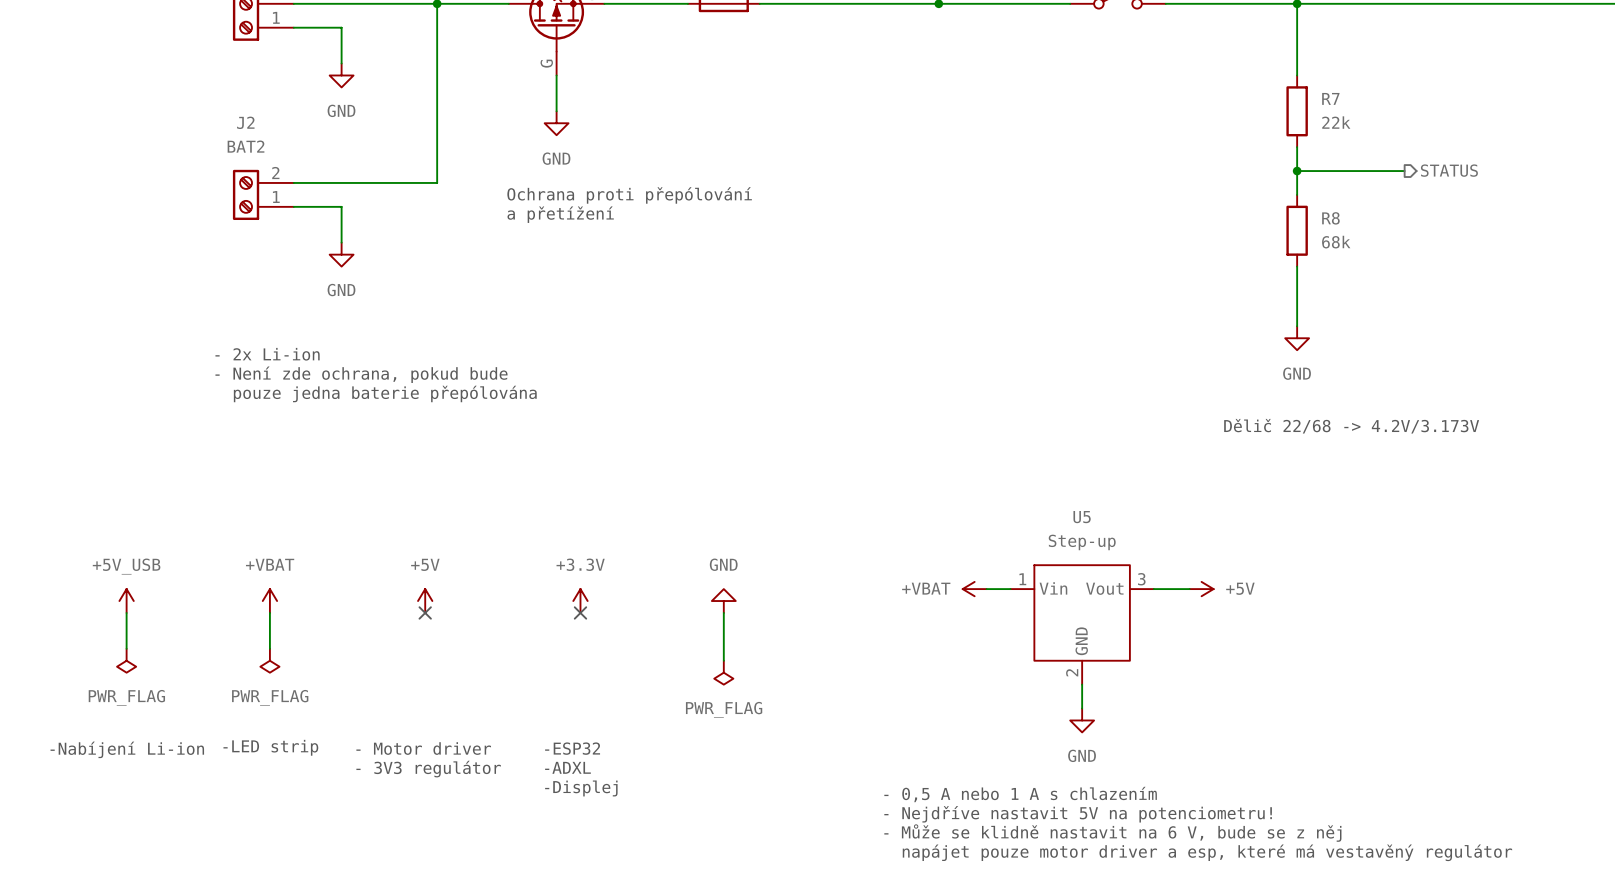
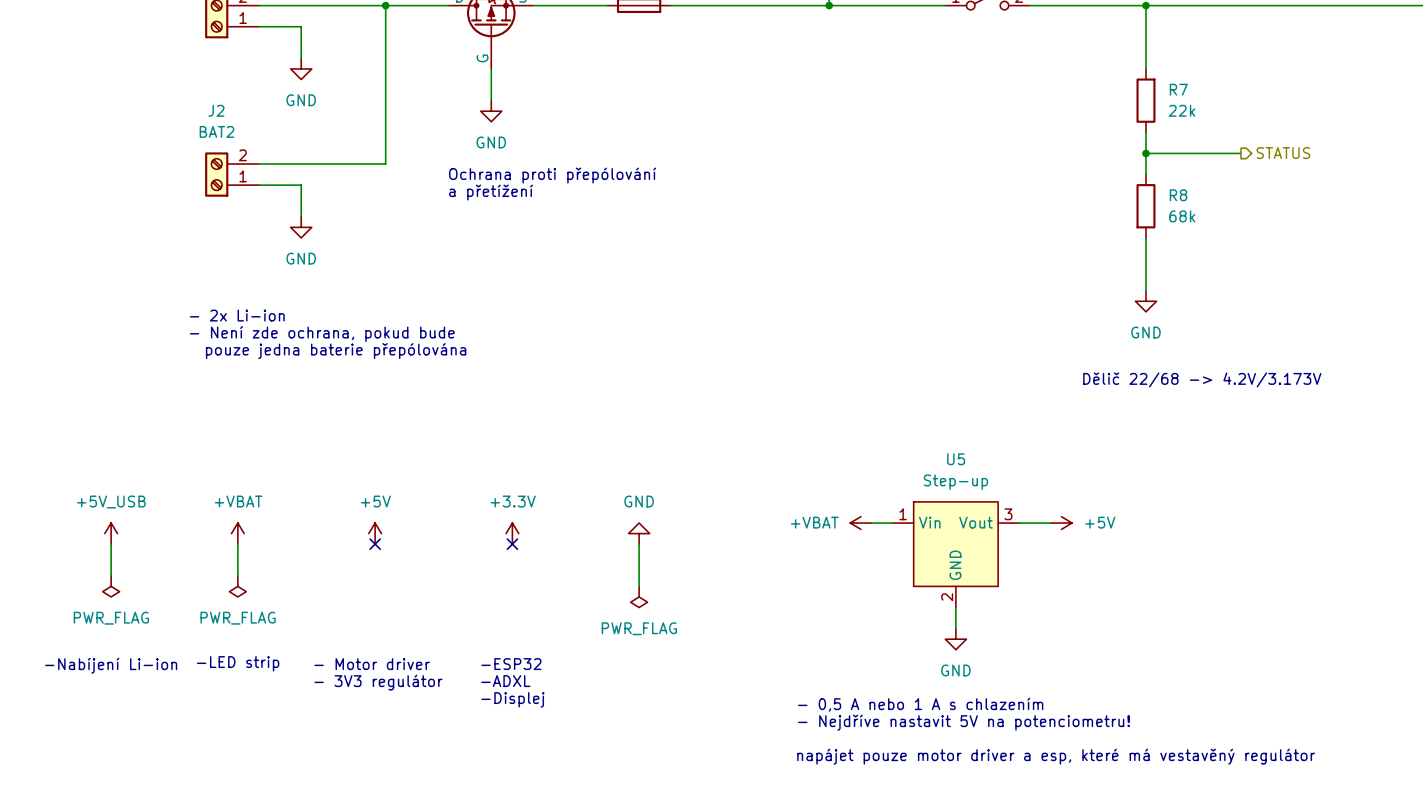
text position: - 0,5 A nebo 1 A s chlazením (1020, 794) -> - 0,5 A nebo 1 A s chlazením (920, 704)
text position: - Nejdříve nastavit 5V na potenciometru! (1078, 814) -> - Nejdříve nastavit 5V na potenciometru! (963, 722)
text: - Může se klidně nastavit na 6 V, bude se z něj (1112, 833) -> none

